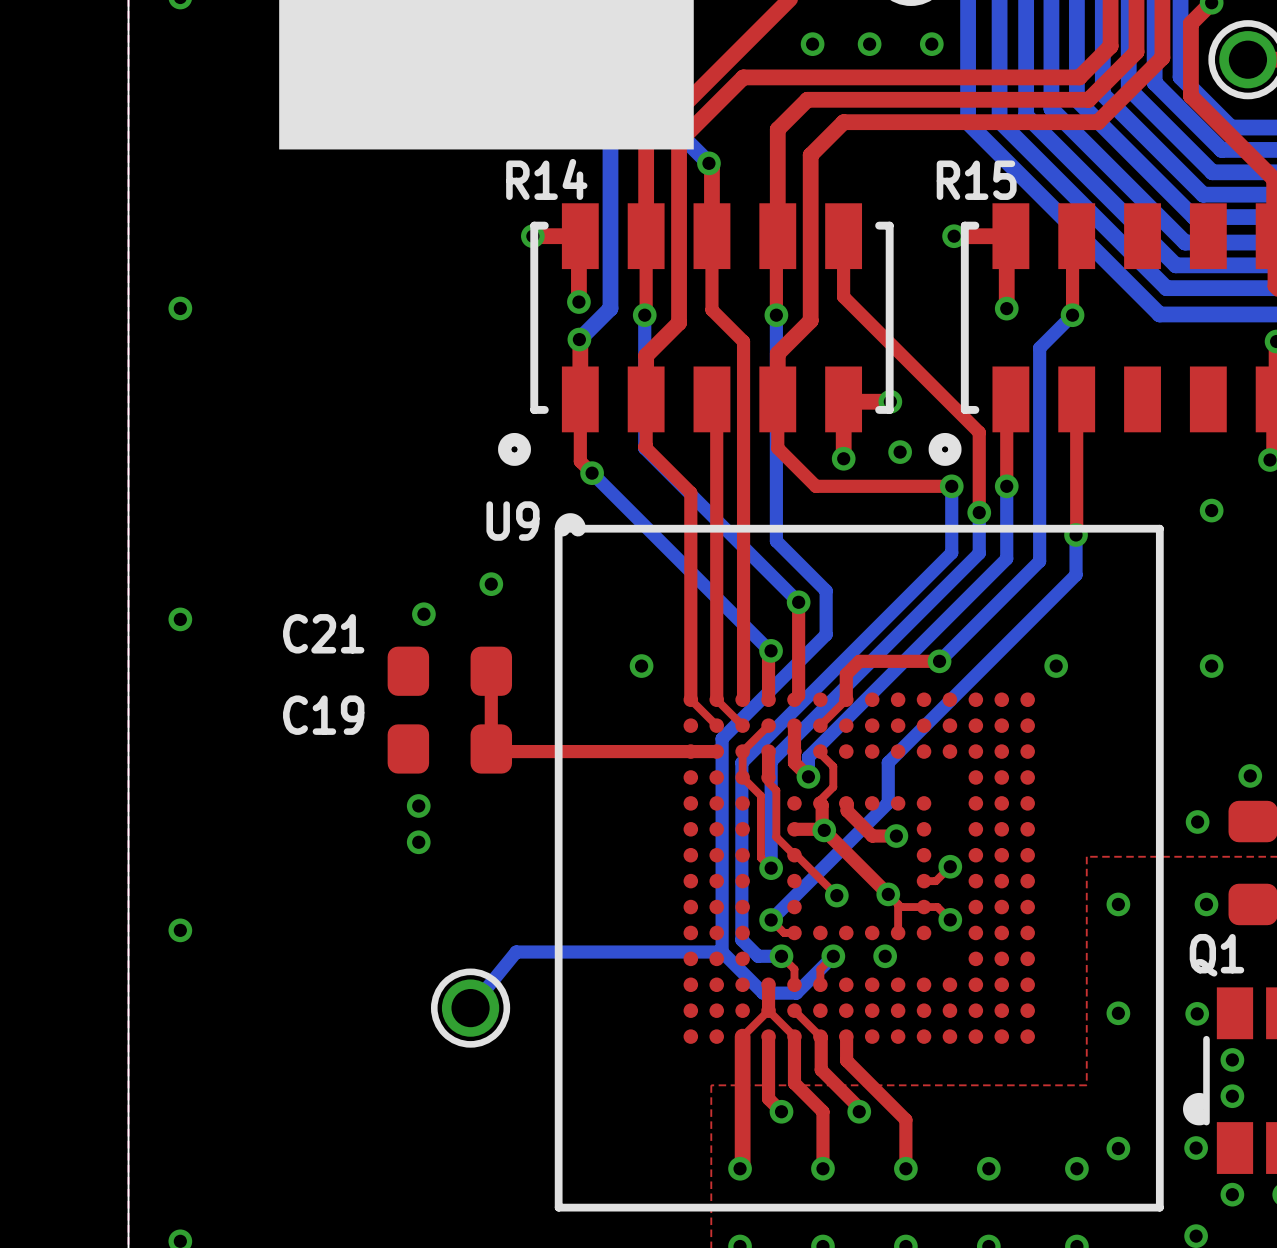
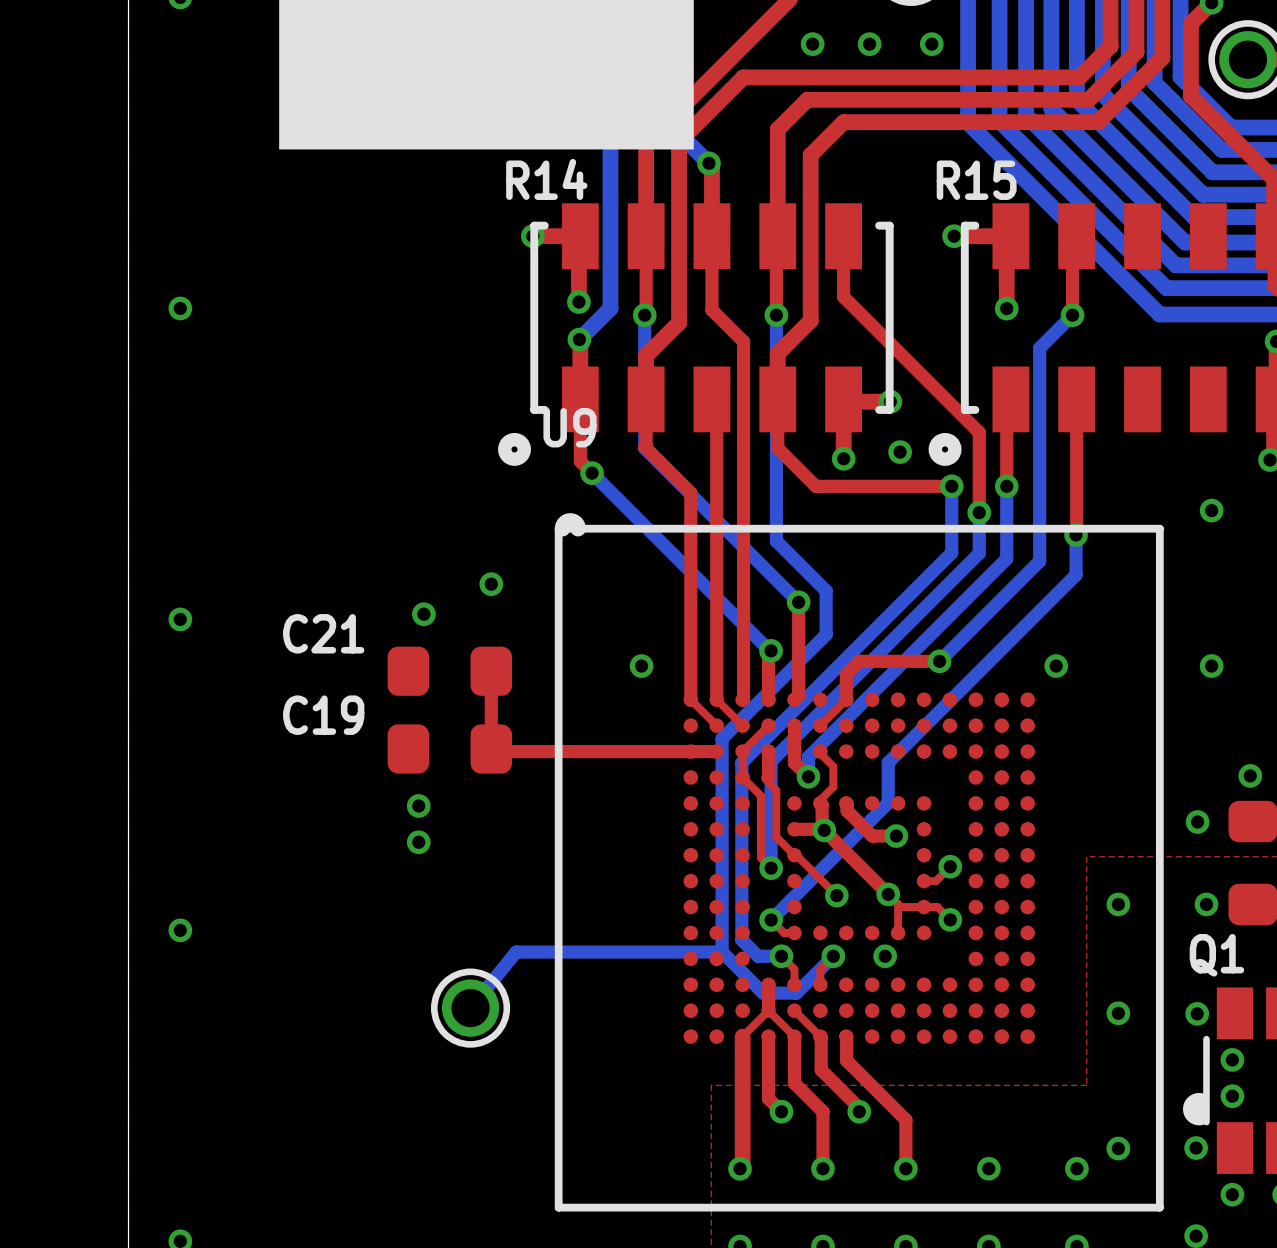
U9 name position: U9 (512, 521) -> U9 (569, 427)

